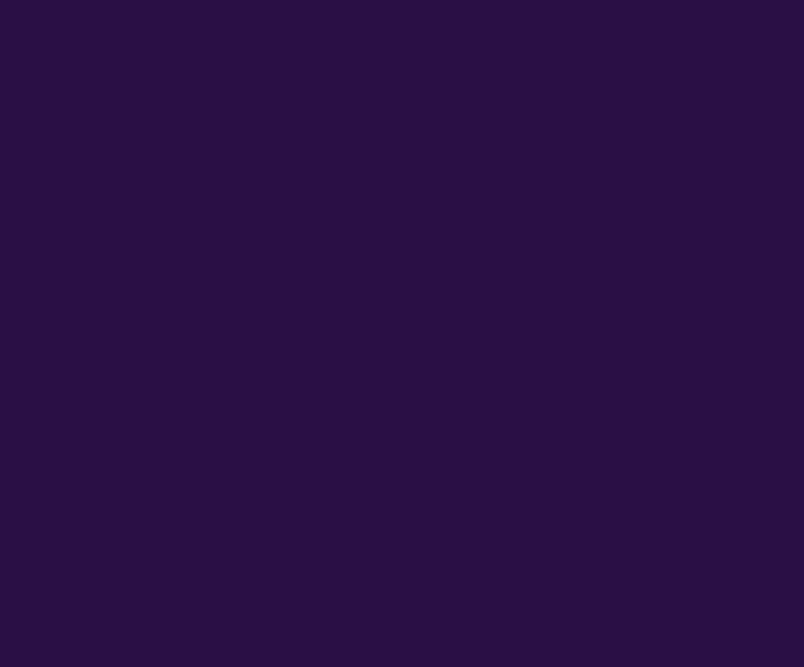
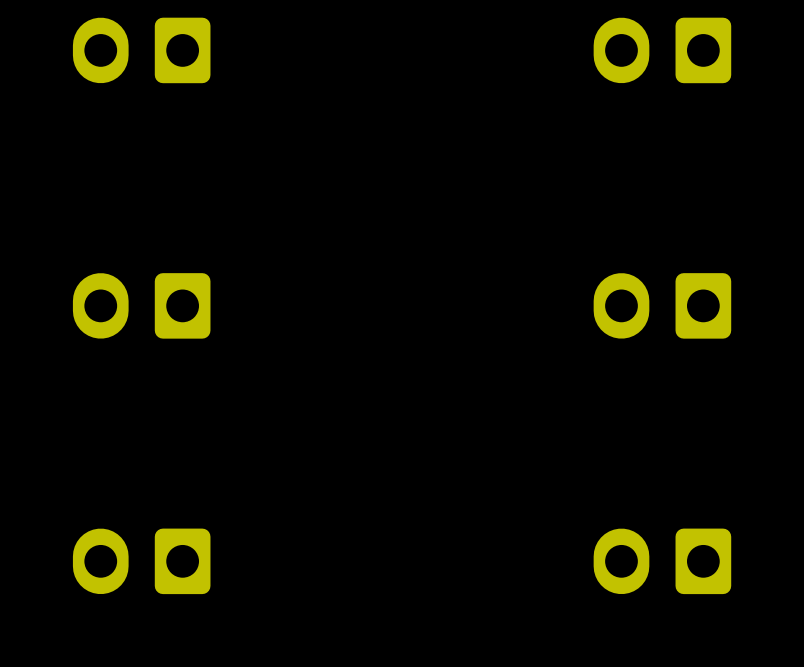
part: none -> (141, 50)
part: none -> (662, 50)
part: none -> (141, 305)
part: none -> (662, 305)
part: none -> (141, 561)
part: none -> (662, 561)

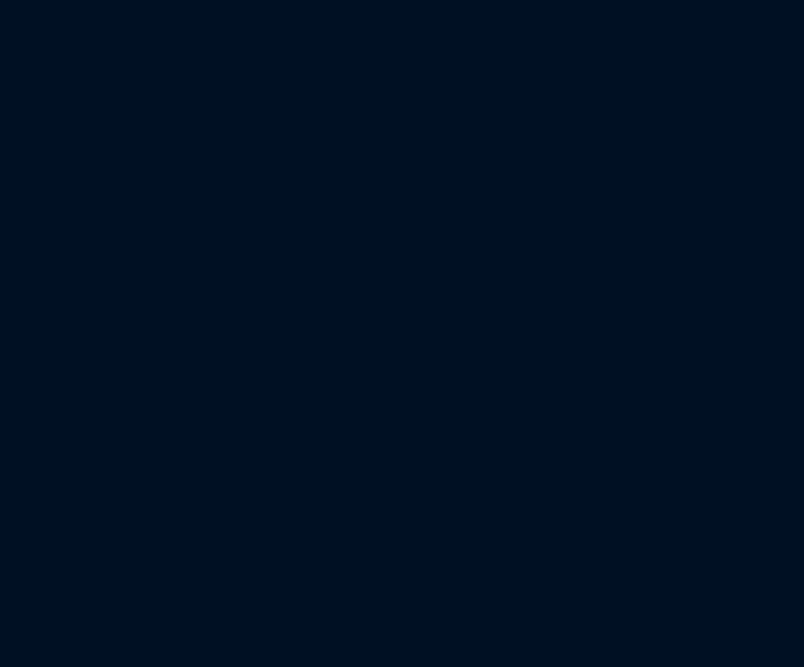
part: (141, 50) -> none
part: (662, 50) -> none
part: (141, 305) -> none
part: (662, 305) -> none
part: (141, 561) -> none
part: (662, 561) -> none

